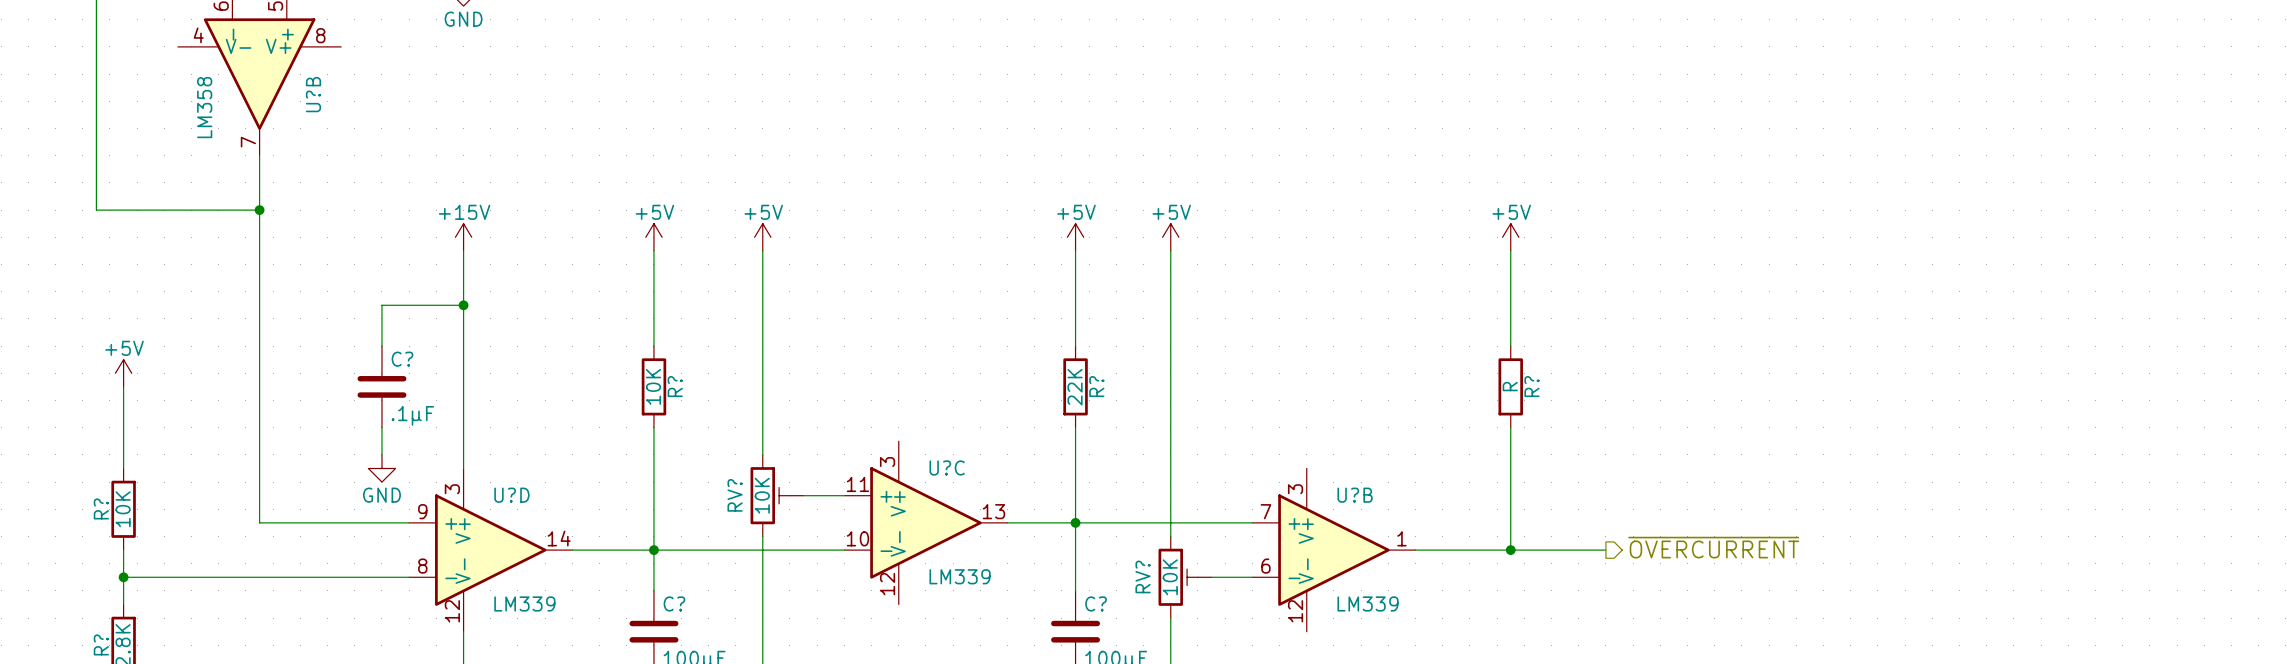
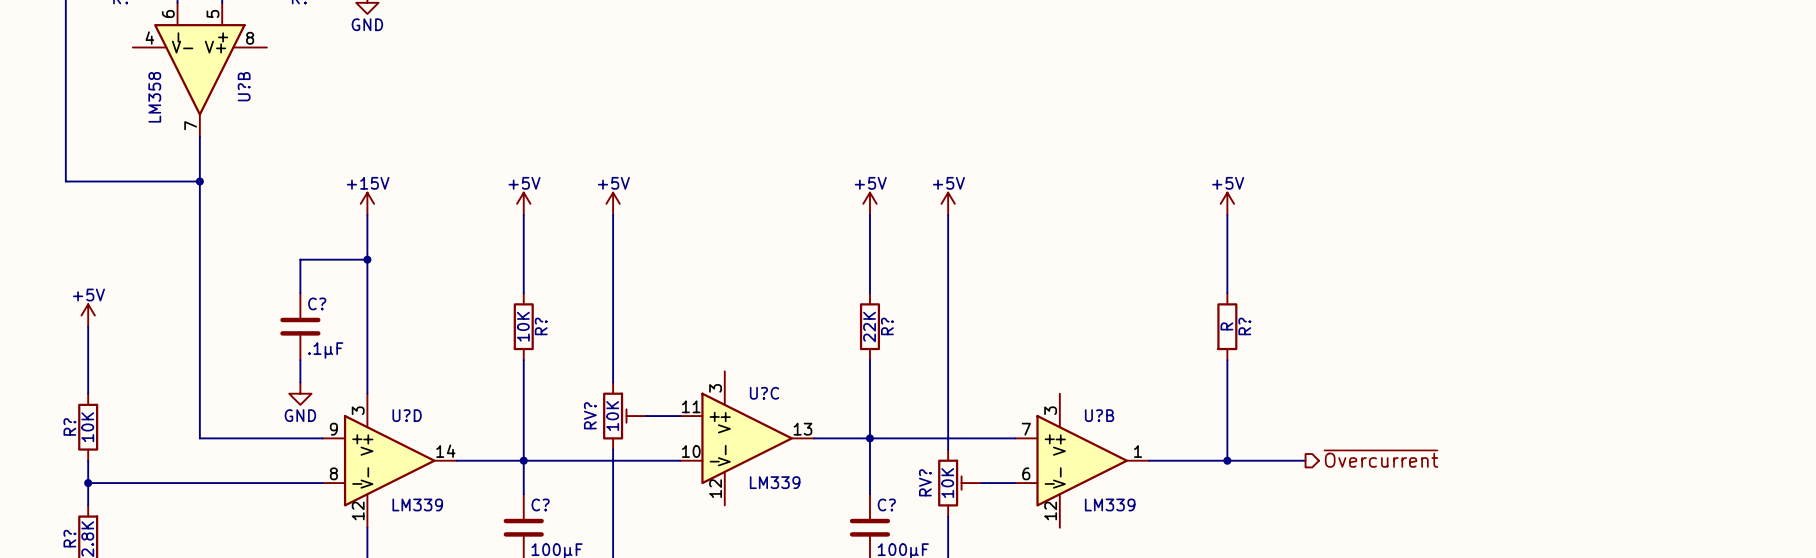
hierarchical label: ~{OVERCURRENT} (1713, 547) -> ~{Overcurrent} (1380, 458)

